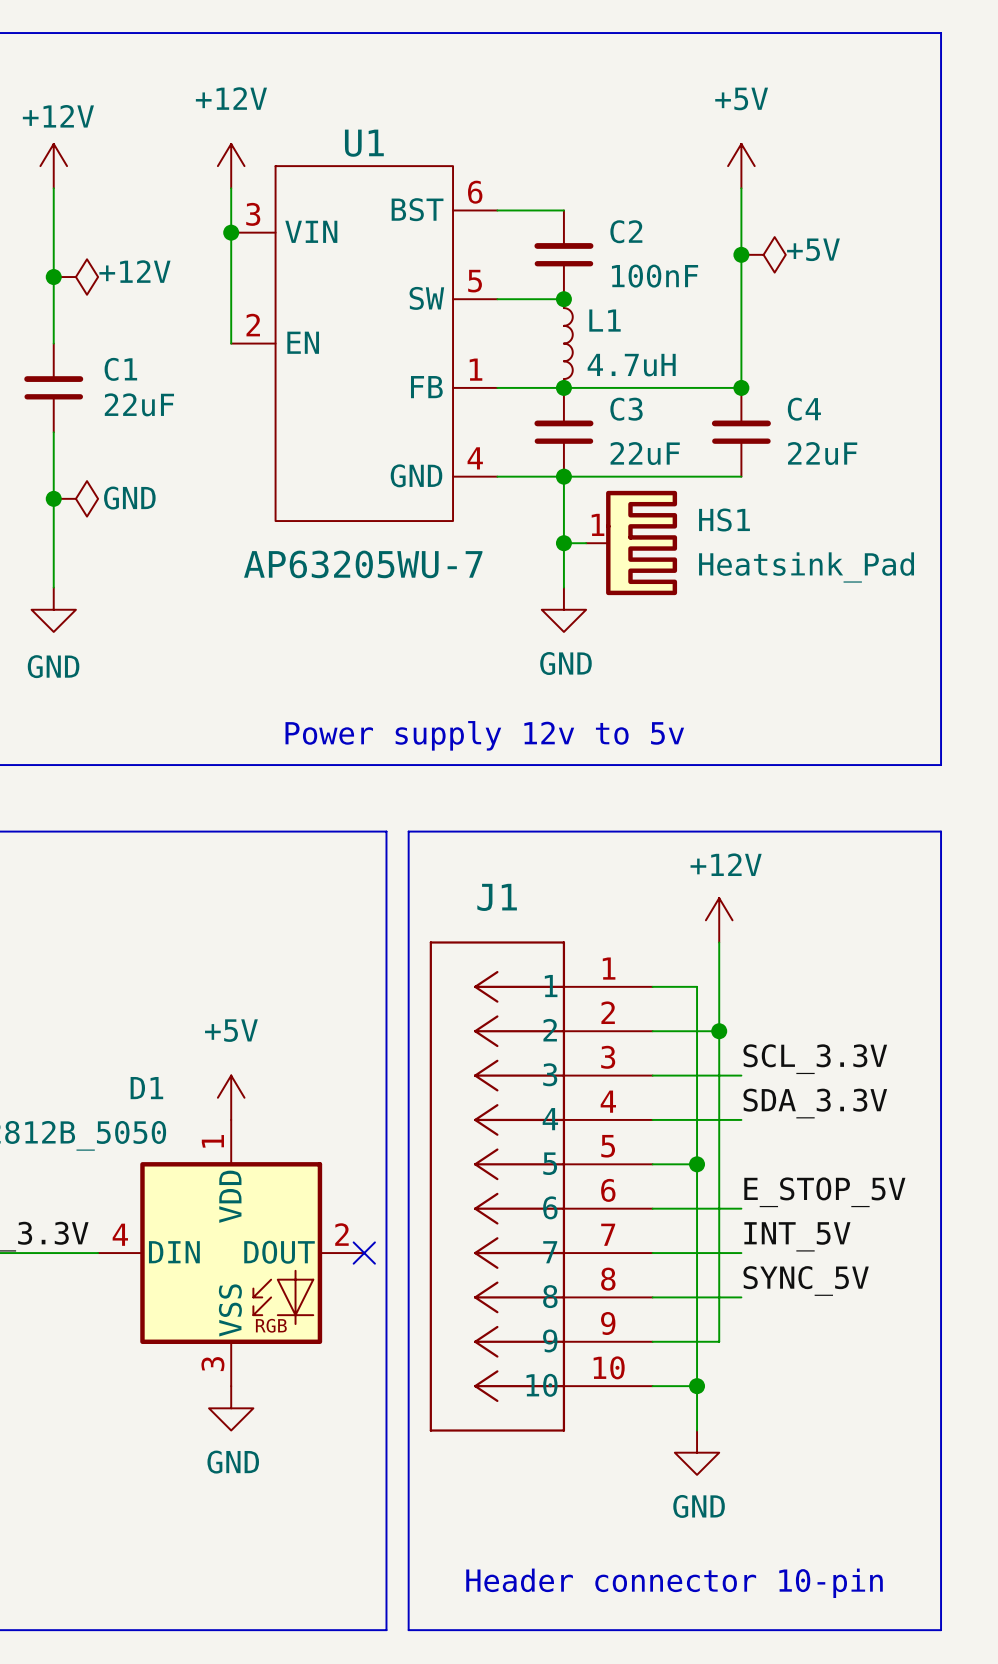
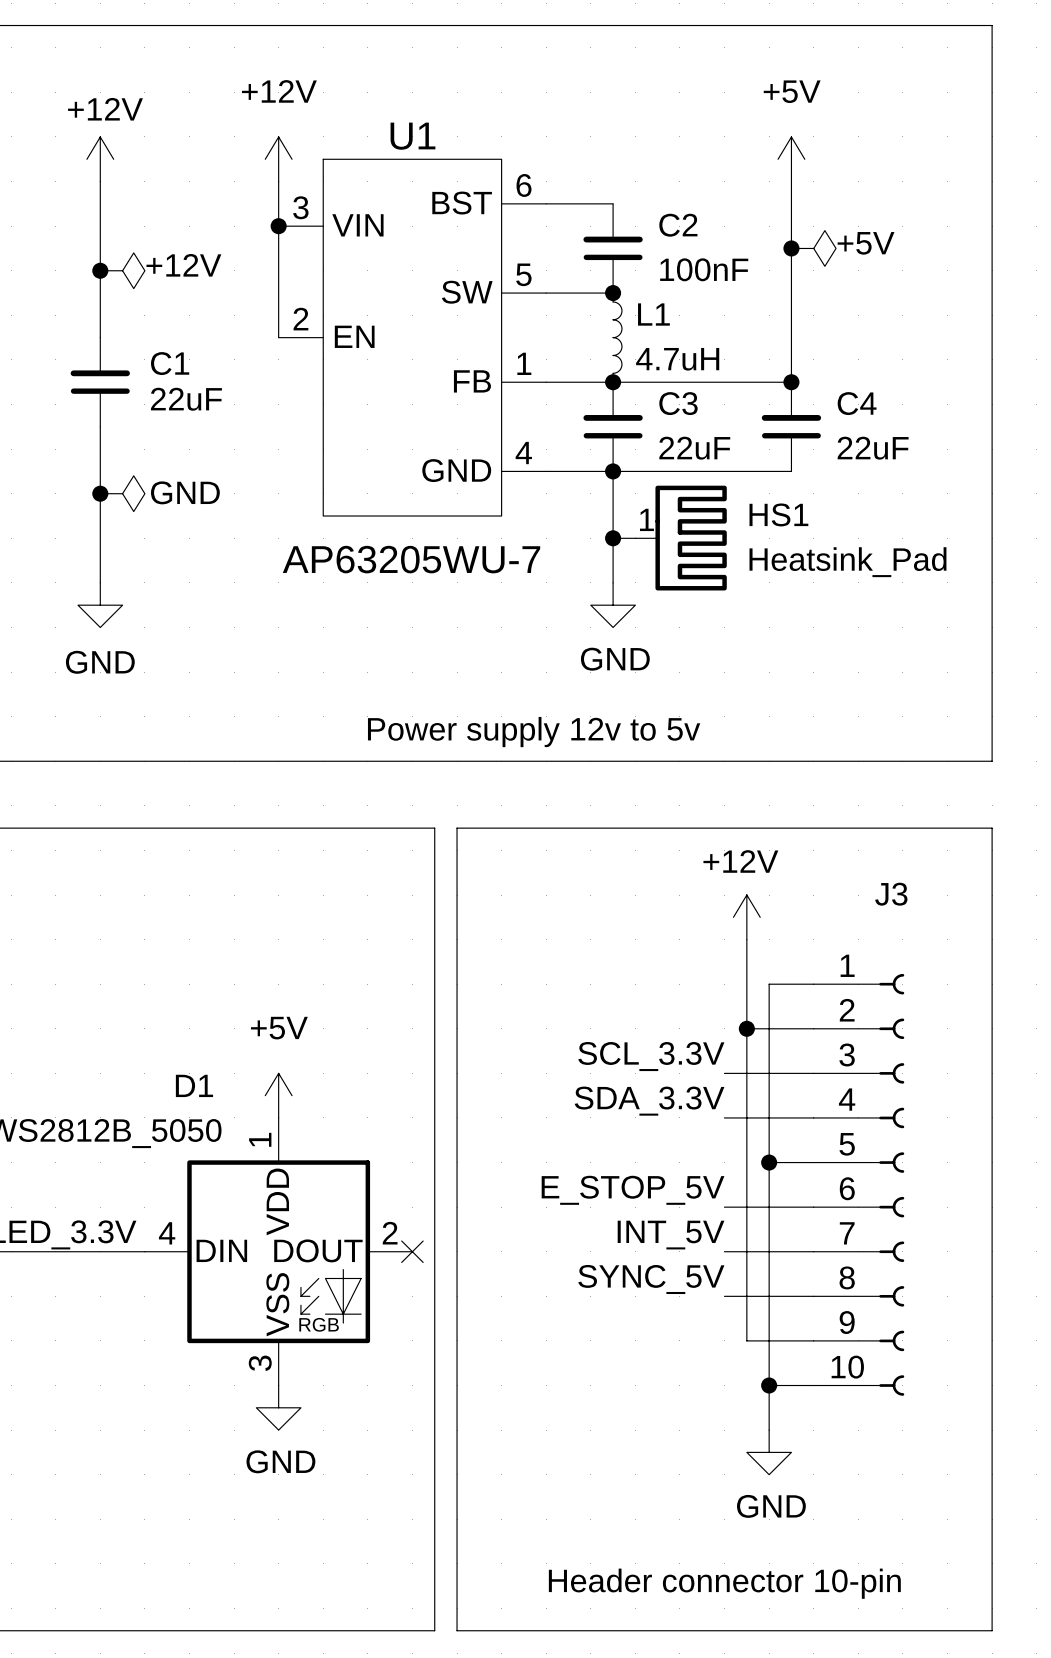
power symbol text position: +12V (726, 864) -> +12V (740, 861)
power symbol position: +12V (719, 920) -> +12V (746, 917)
wire: (719, 942) (719, 986) -> (813, 984) (769, 984)
wire: (652, 986) (697, 986) -> (746, 939) (746, 984)
wire: (652, 1031) (697, 1031) -> (769, 1028) (813, 1028)
junction position: (719, 1031) -> (746, 1028)
label position: SCL_3.3V (815, 1059) -> SCL_3.3V (651, 1056)
wire: (652, 1075) (674, 1075) -> (791, 1073) (813, 1073)
label position: SDA_3.3V (815, 1103) -> SDA_3.3V (649, 1101)
wire: (652, 1119) (674, 1119) -> (791, 1117) (813, 1117)
wire: (652, 1164) (697, 1164) -> (769, 1162) (813, 1162)
junction position: (697, 1164) -> (769, 1162)
J1: (541, 1186) -> none
J3: none -> (859, 1184)
label position: E_STOP_5V (824, 1192) -> E_STOP_5V (633, 1190)
wire: (652, 1208) (674, 1208) -> (791, 1207) (813, 1207)
label position: INT_5V (797, 1236) -> INT_5V (671, 1235)
wire: (652, 1253) (674, 1253) -> (791, 1251) (813, 1251)
label position: SYNC_5V (806, 1281) -> SYNC_5V (651, 1279)
wire: (652, 1297) (674, 1297) -> (791, 1296) (813, 1296)
wire: (652, 1341) (697, 1341) (697, 1430) -> none
wire: none -> (813, 1340) (769, 1340) (769, 1430)
wire: (652, 1386) (697, 1386) -> (769, 1385) (813, 1385)
junction position: (697, 1386) -> (769, 1385)
power symbol position: GND (697, 1452) -> GND (769, 1452)

